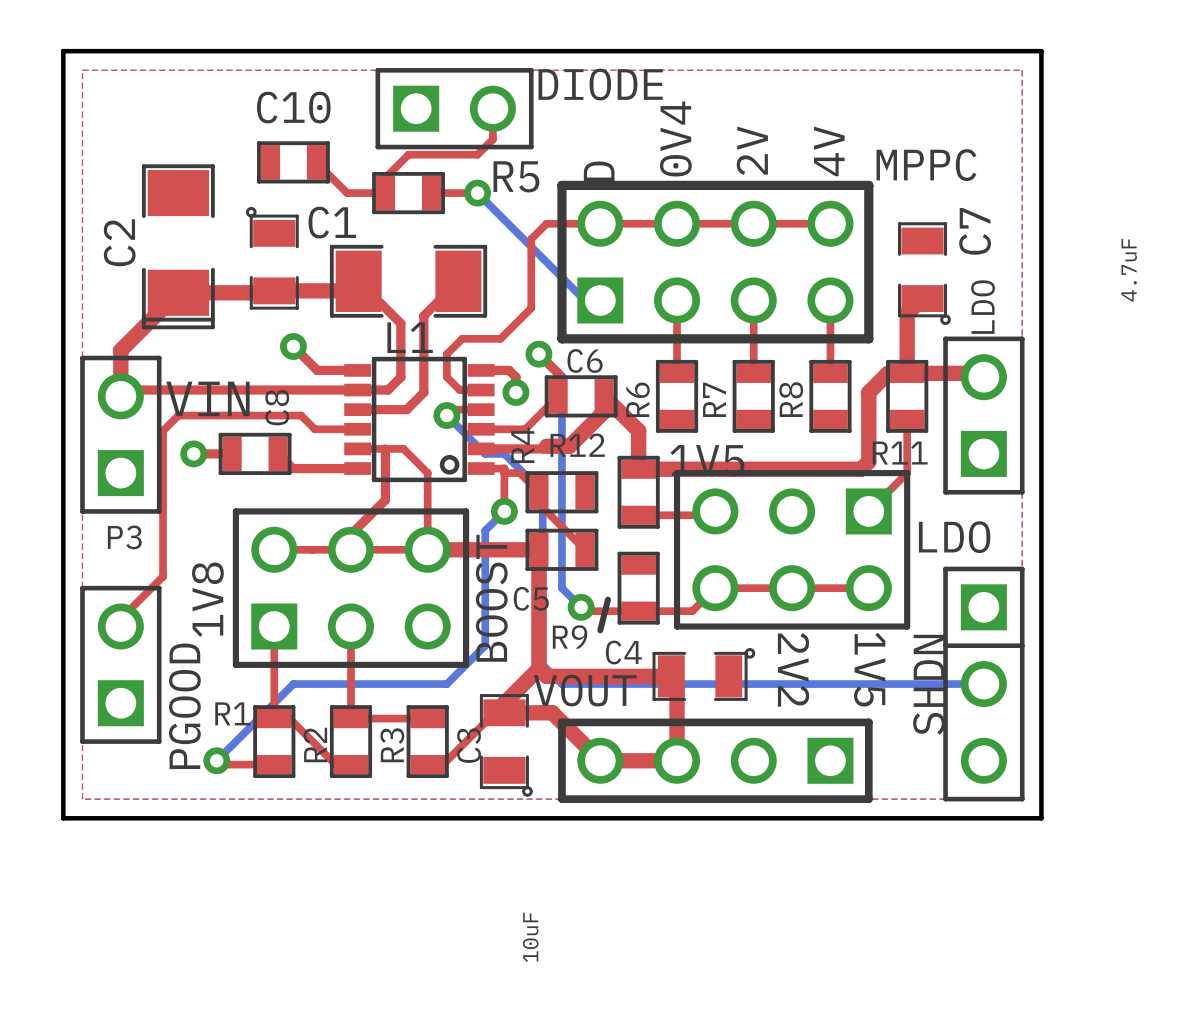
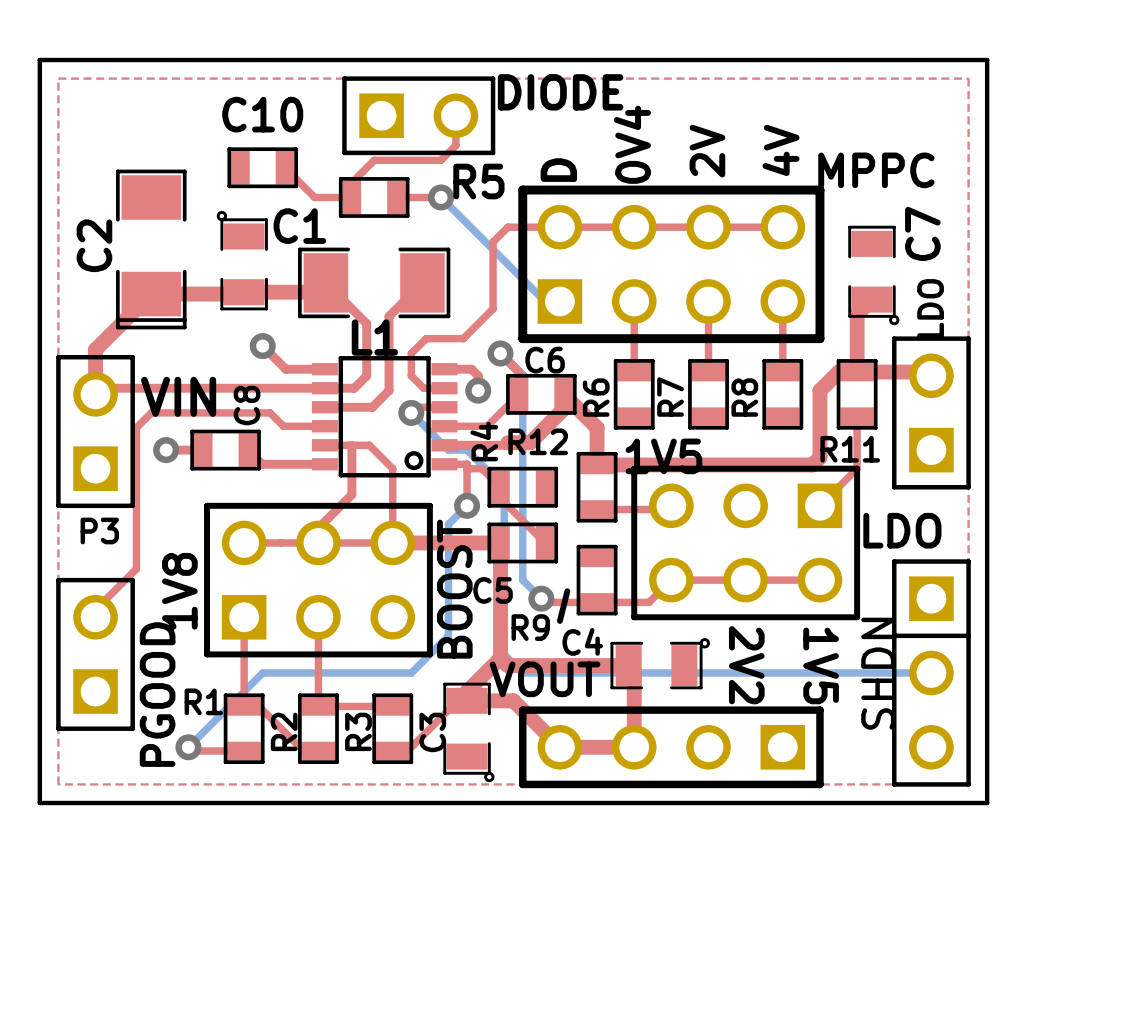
C7 value: 4.7uF (1129, 270) -> none
C3 value: 10uF (530, 937) -> none

